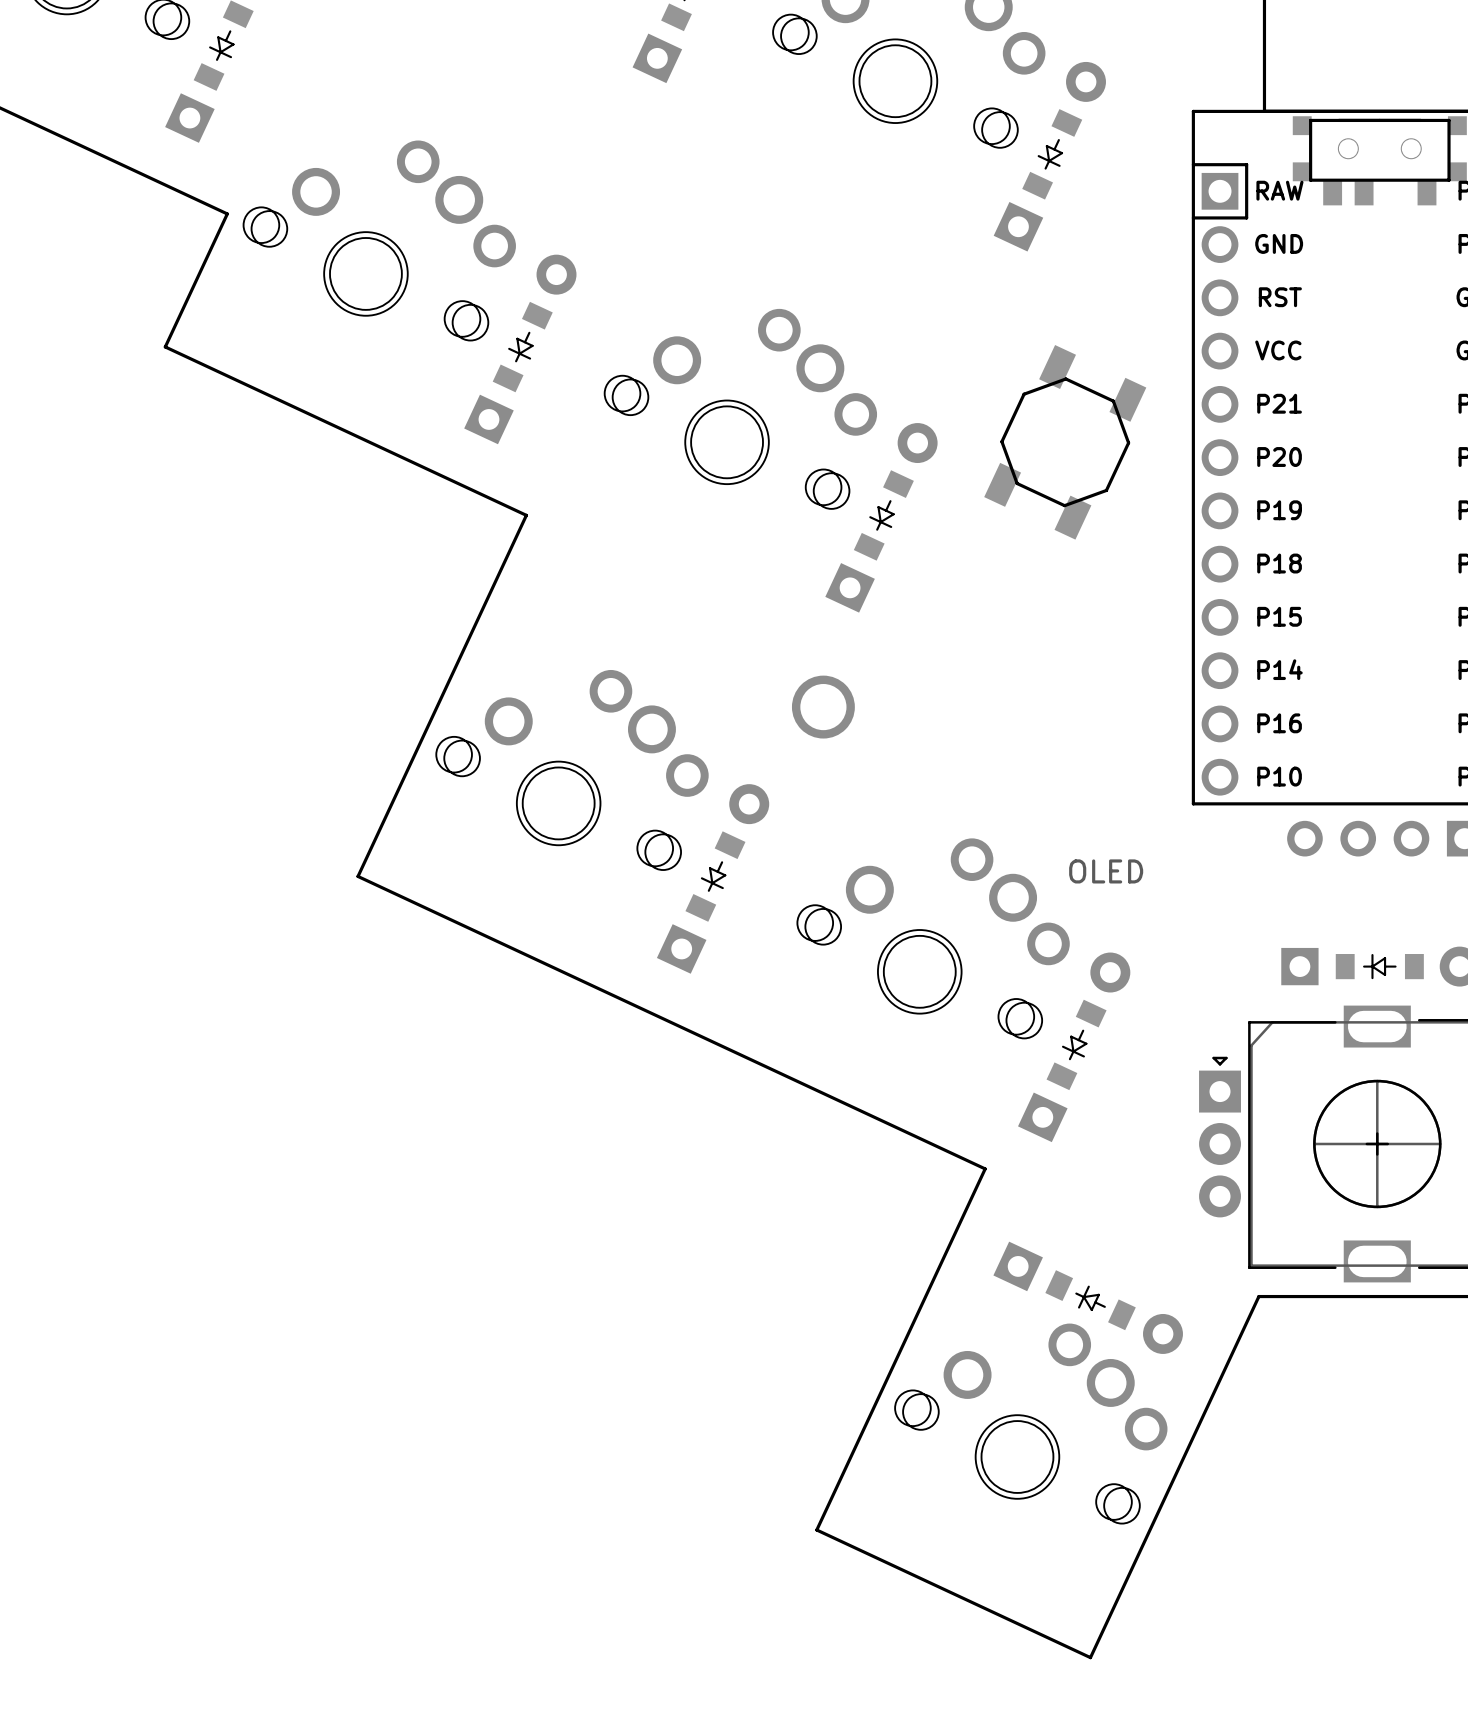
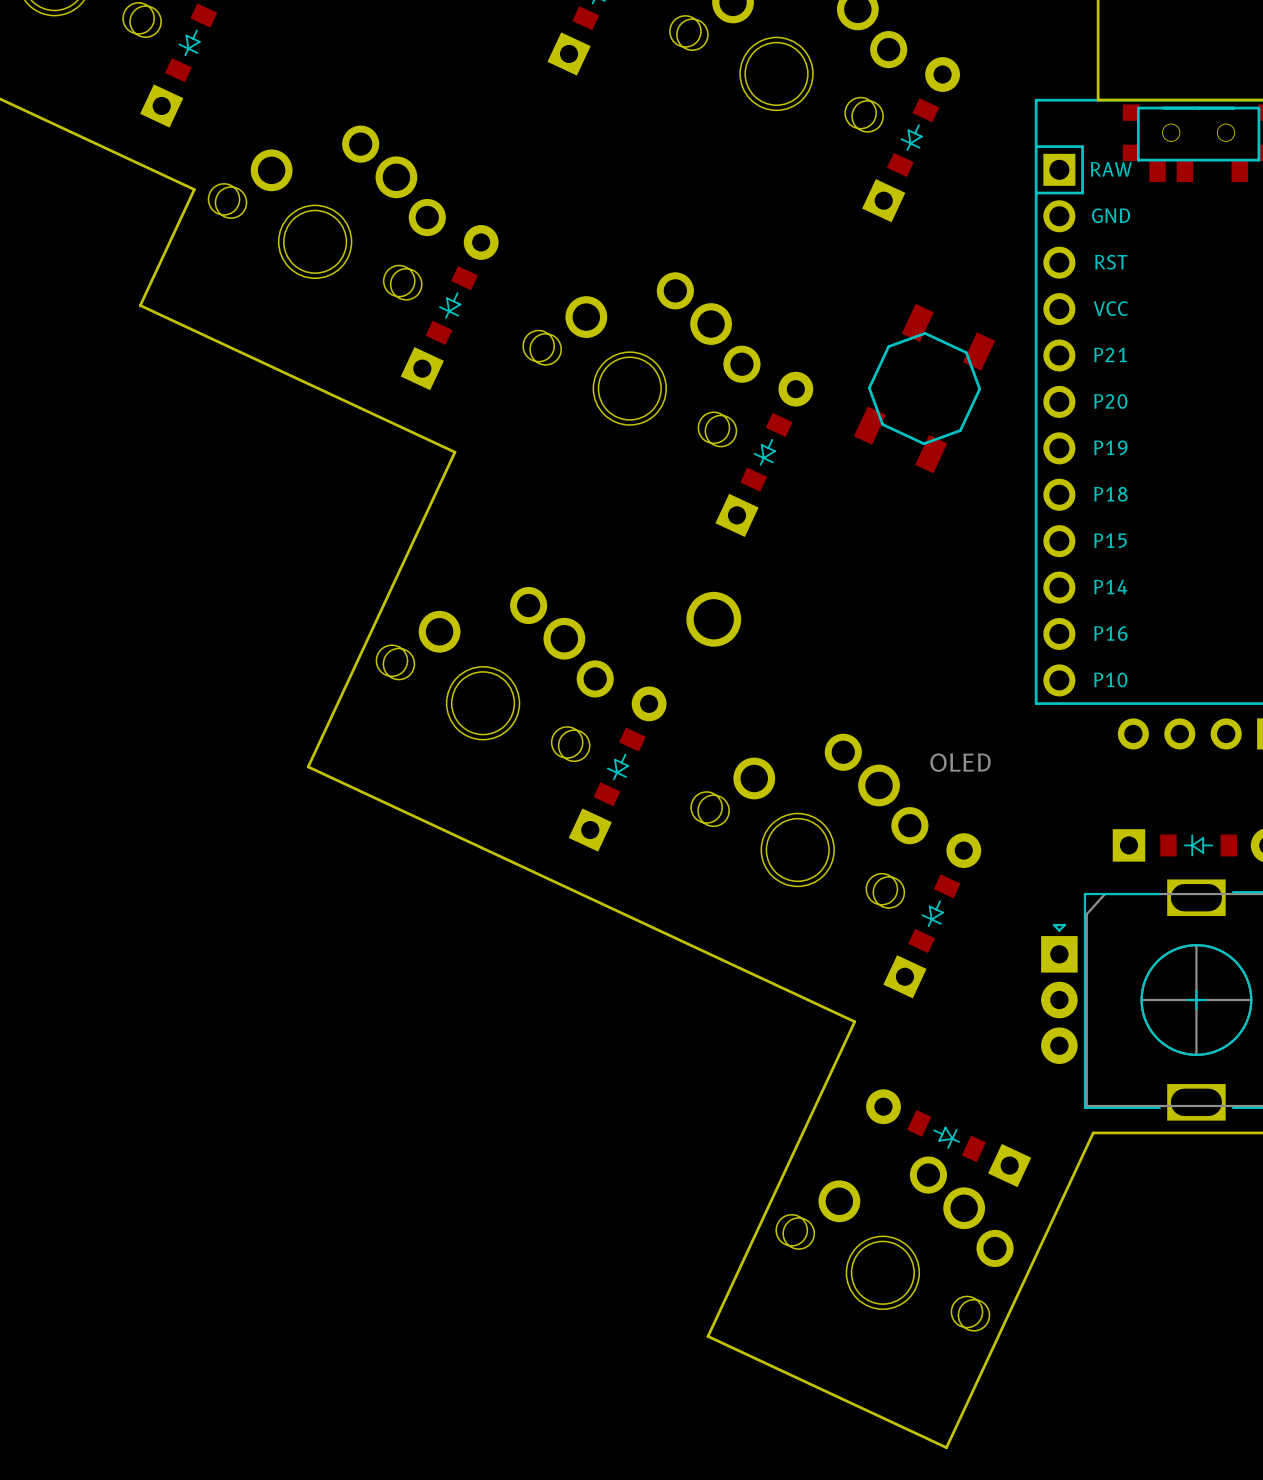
part footprint: [993, 1241, 1183, 1354] -> [866, 1089, 1032, 1188]

